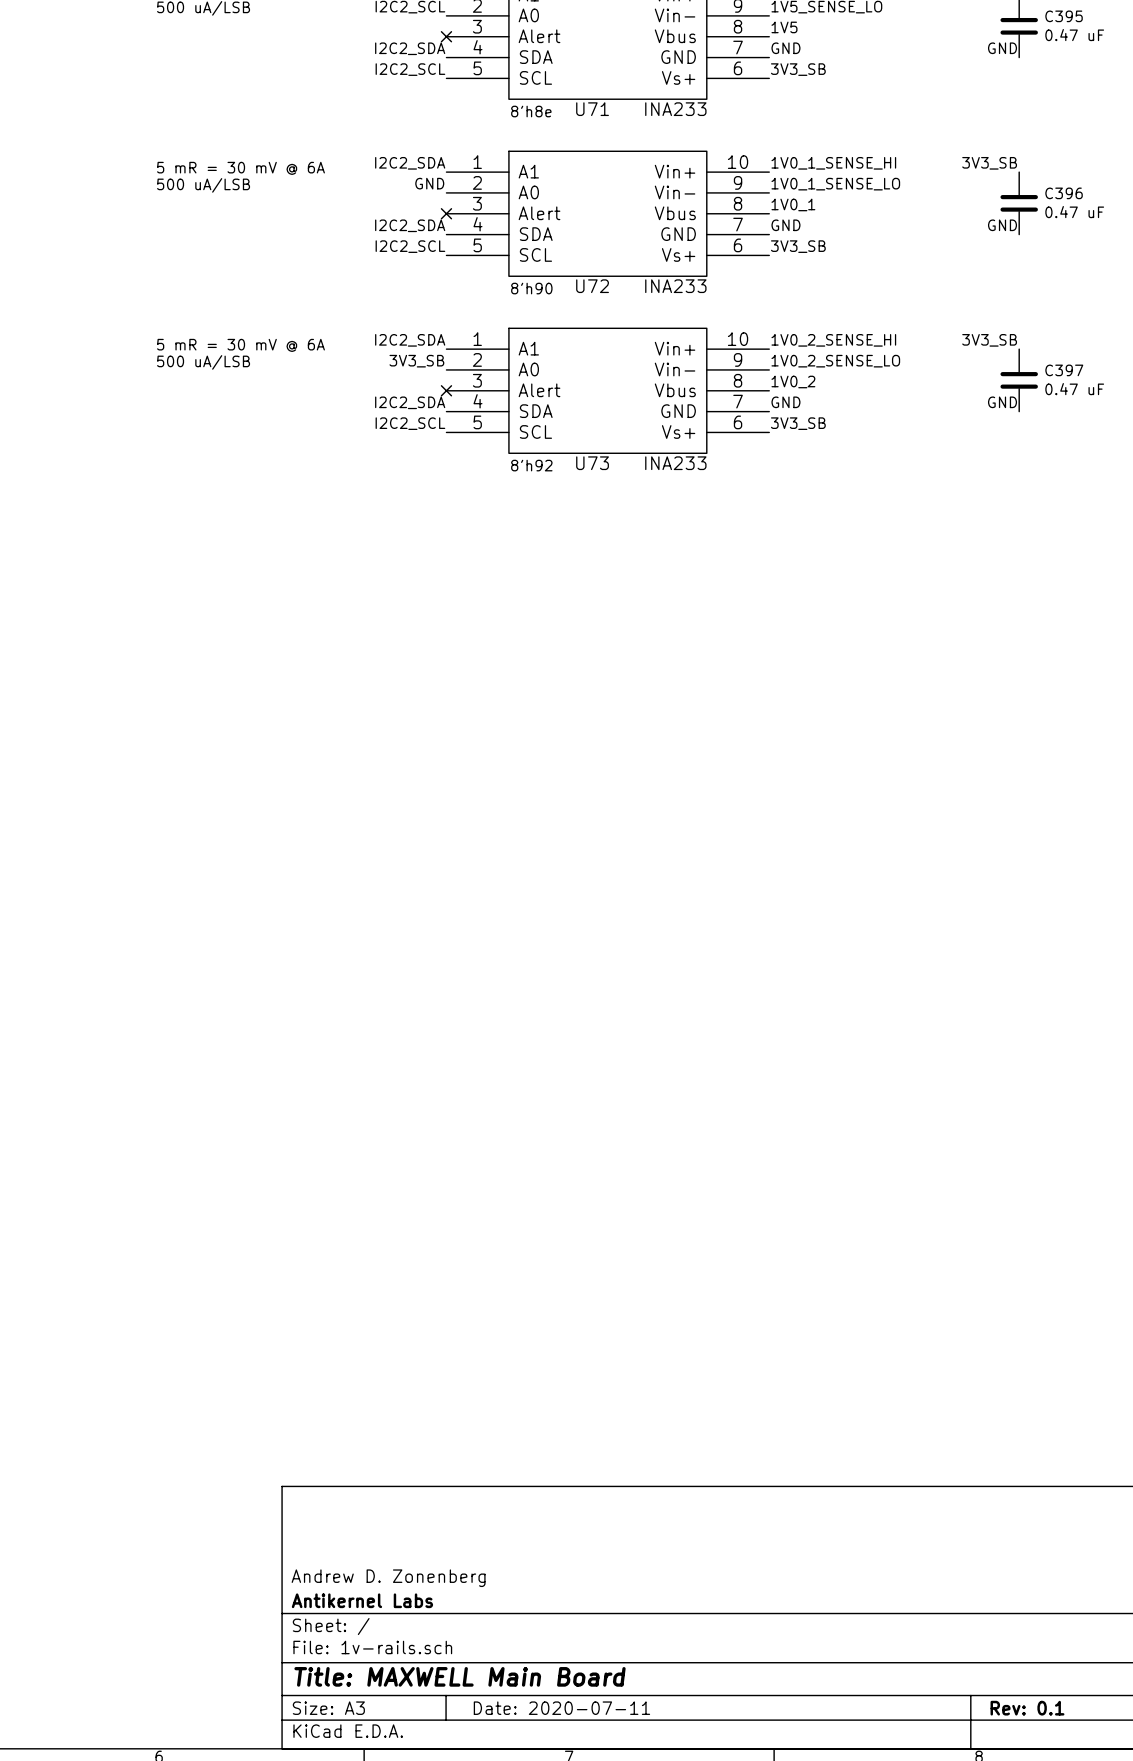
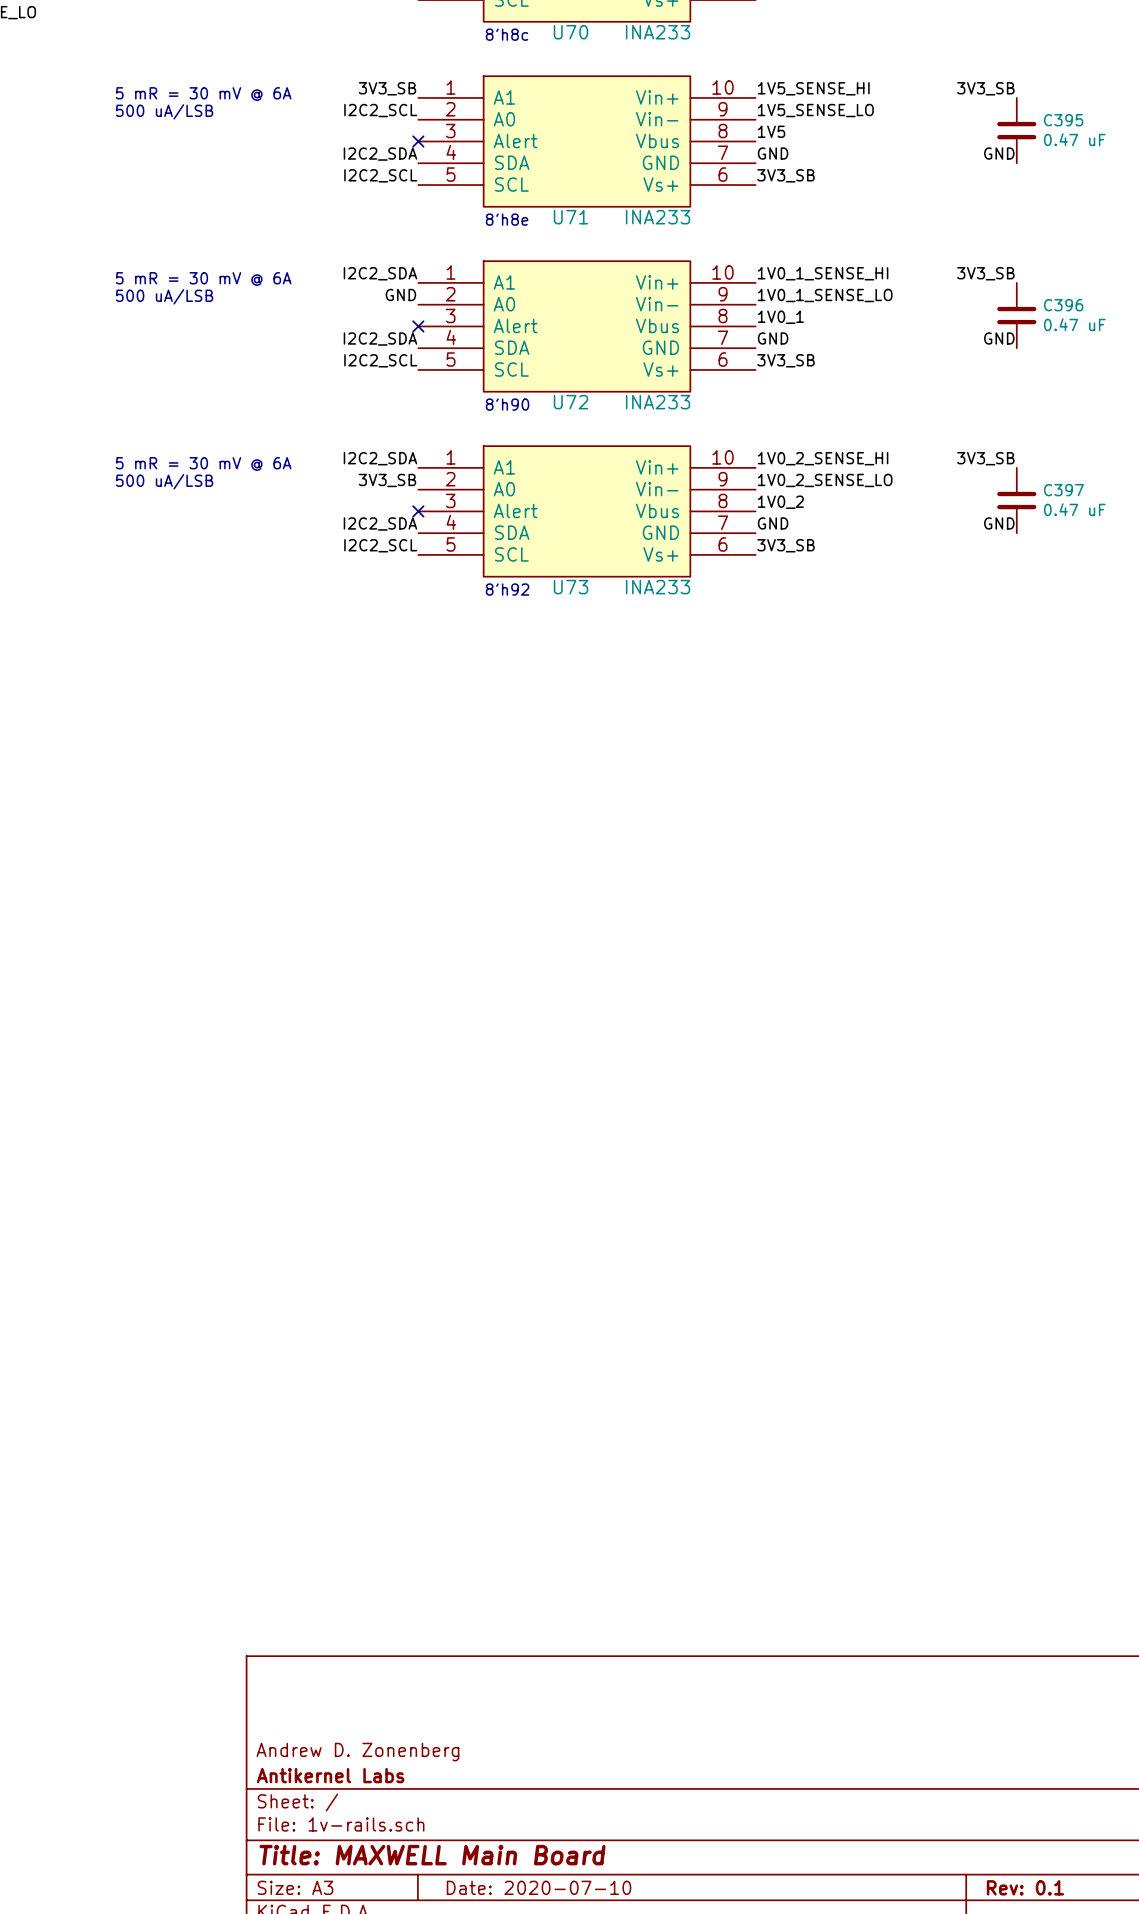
title block: Date: 2020-07-11 (561, 1708) -> Date: 2020-07-10 (539, 1887)

